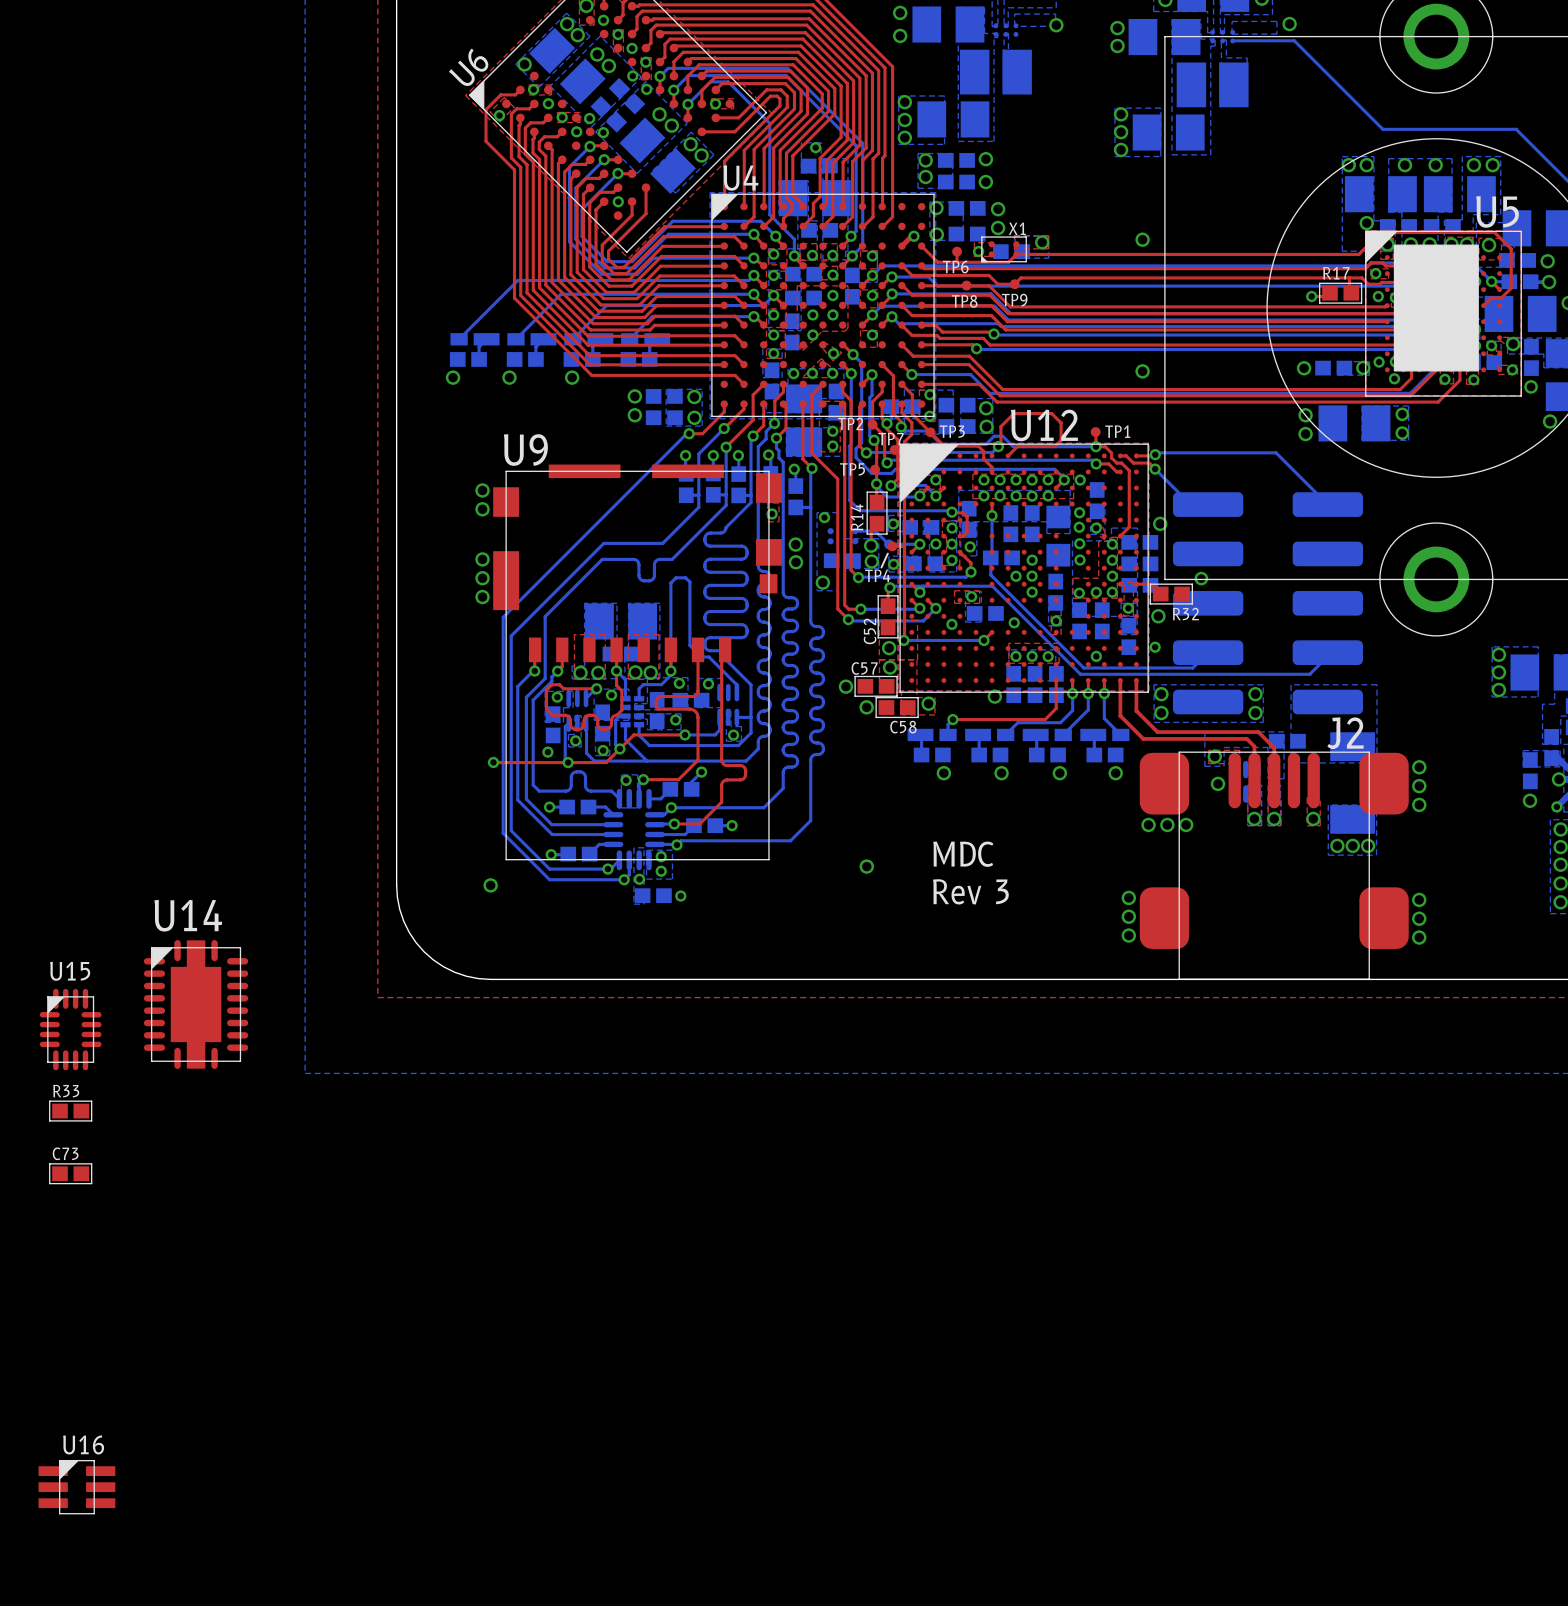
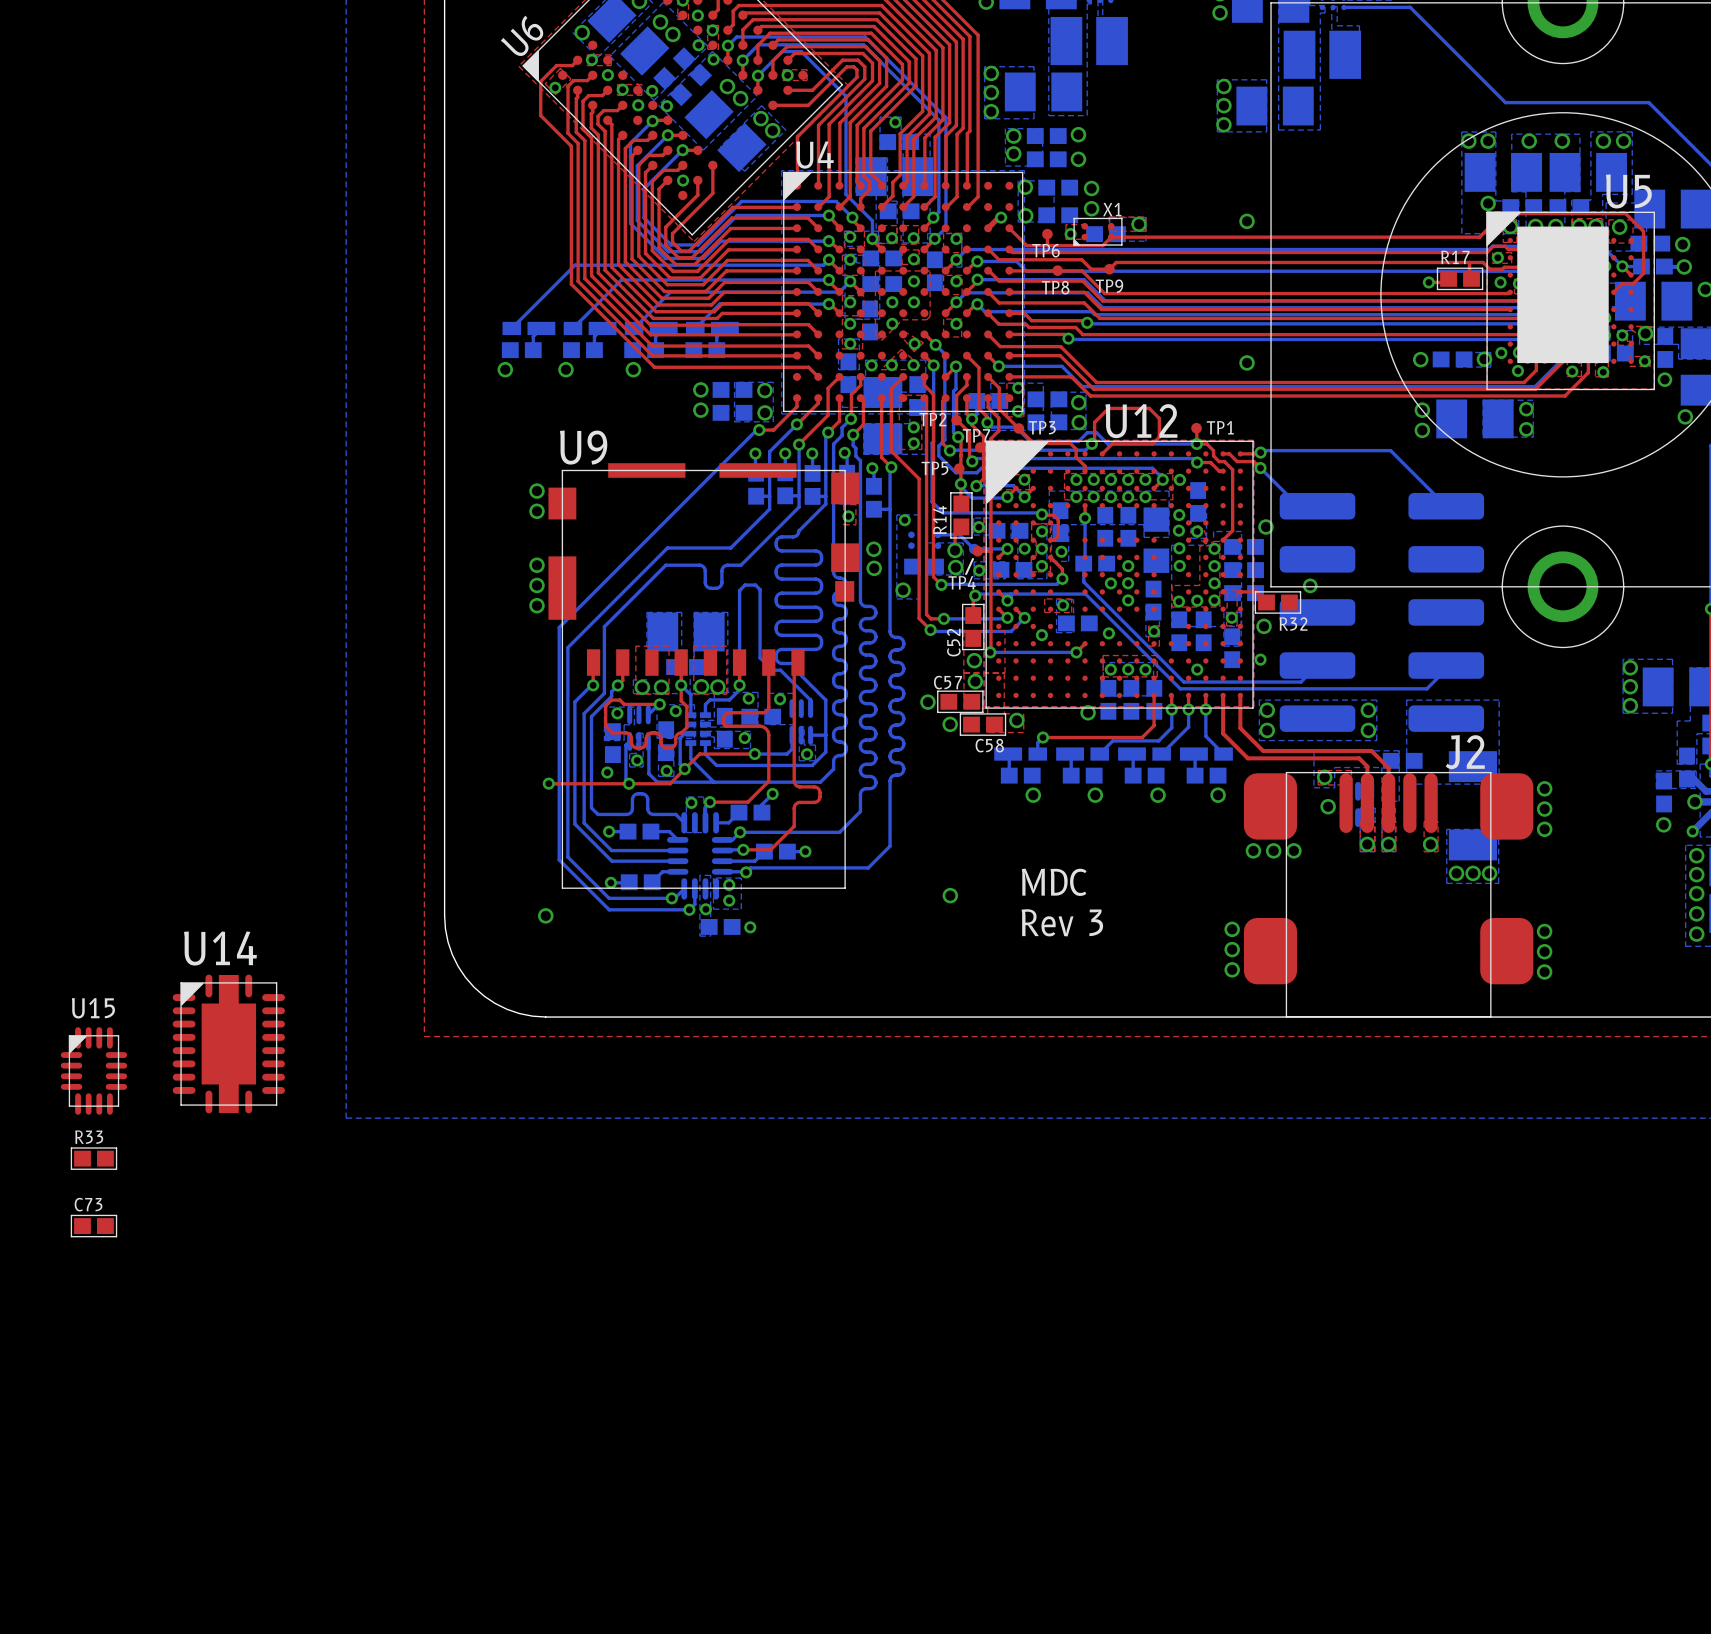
U16: (76, 1487) -> none

